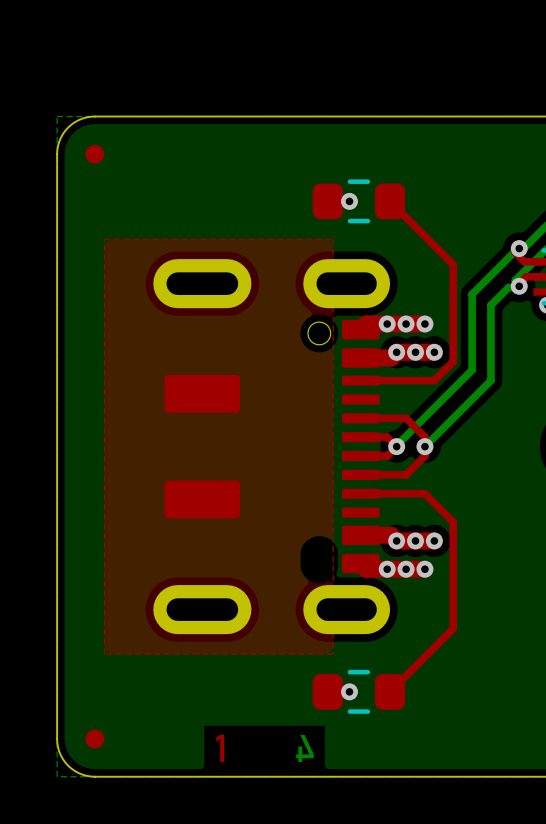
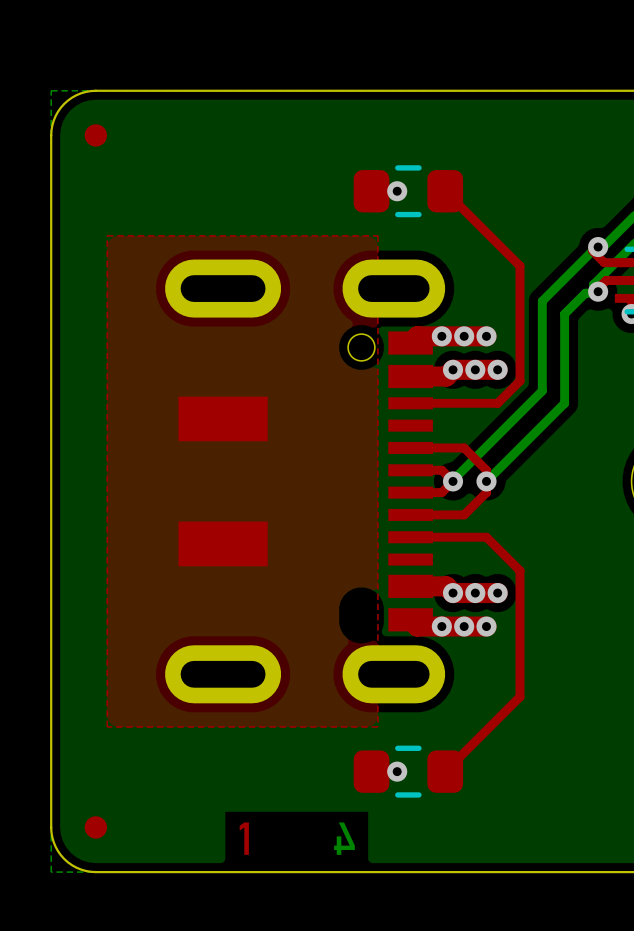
part footprint: [153, 259, 391, 635] -> [165, 259, 446, 704]

